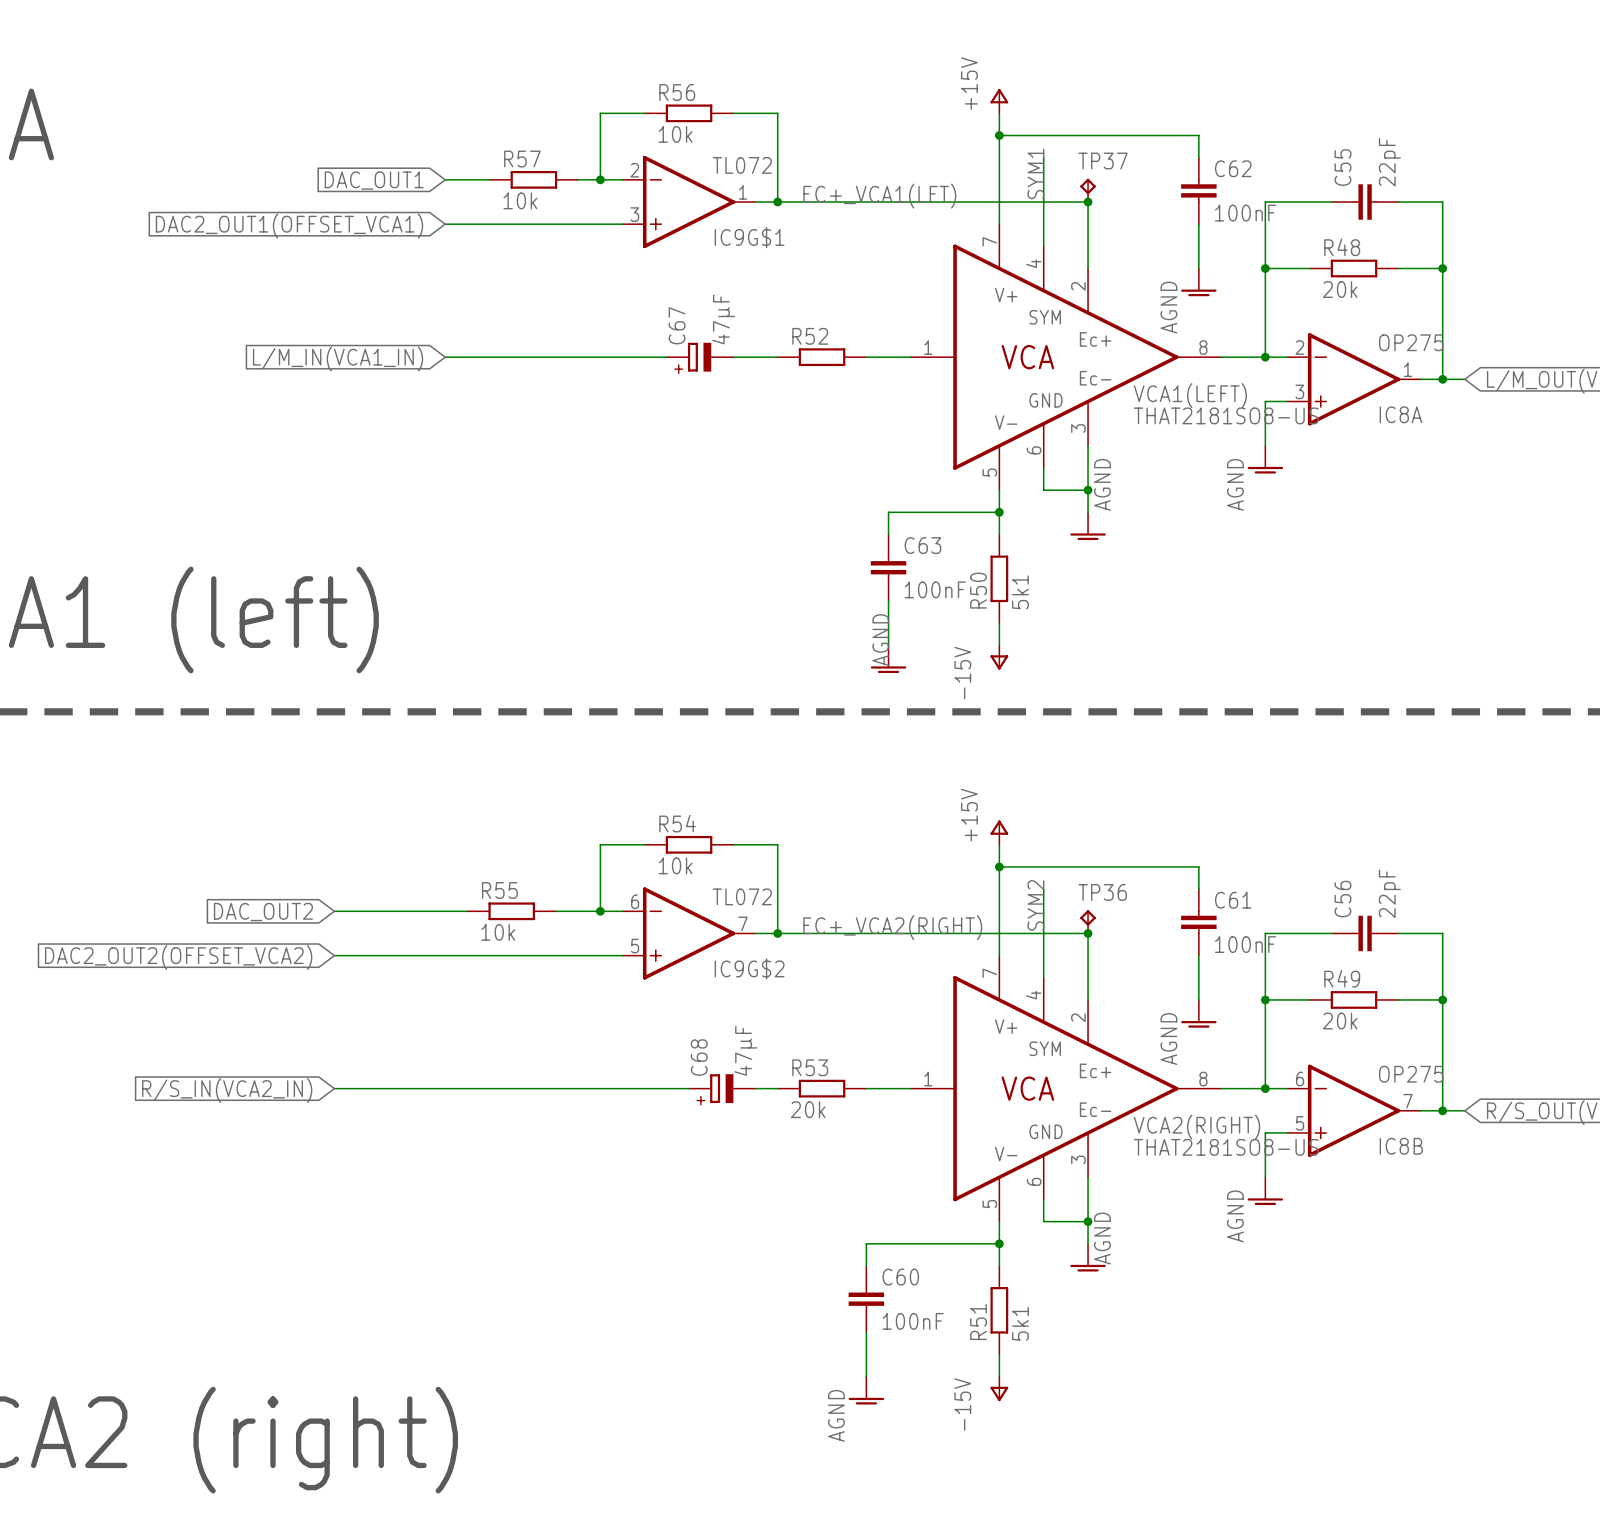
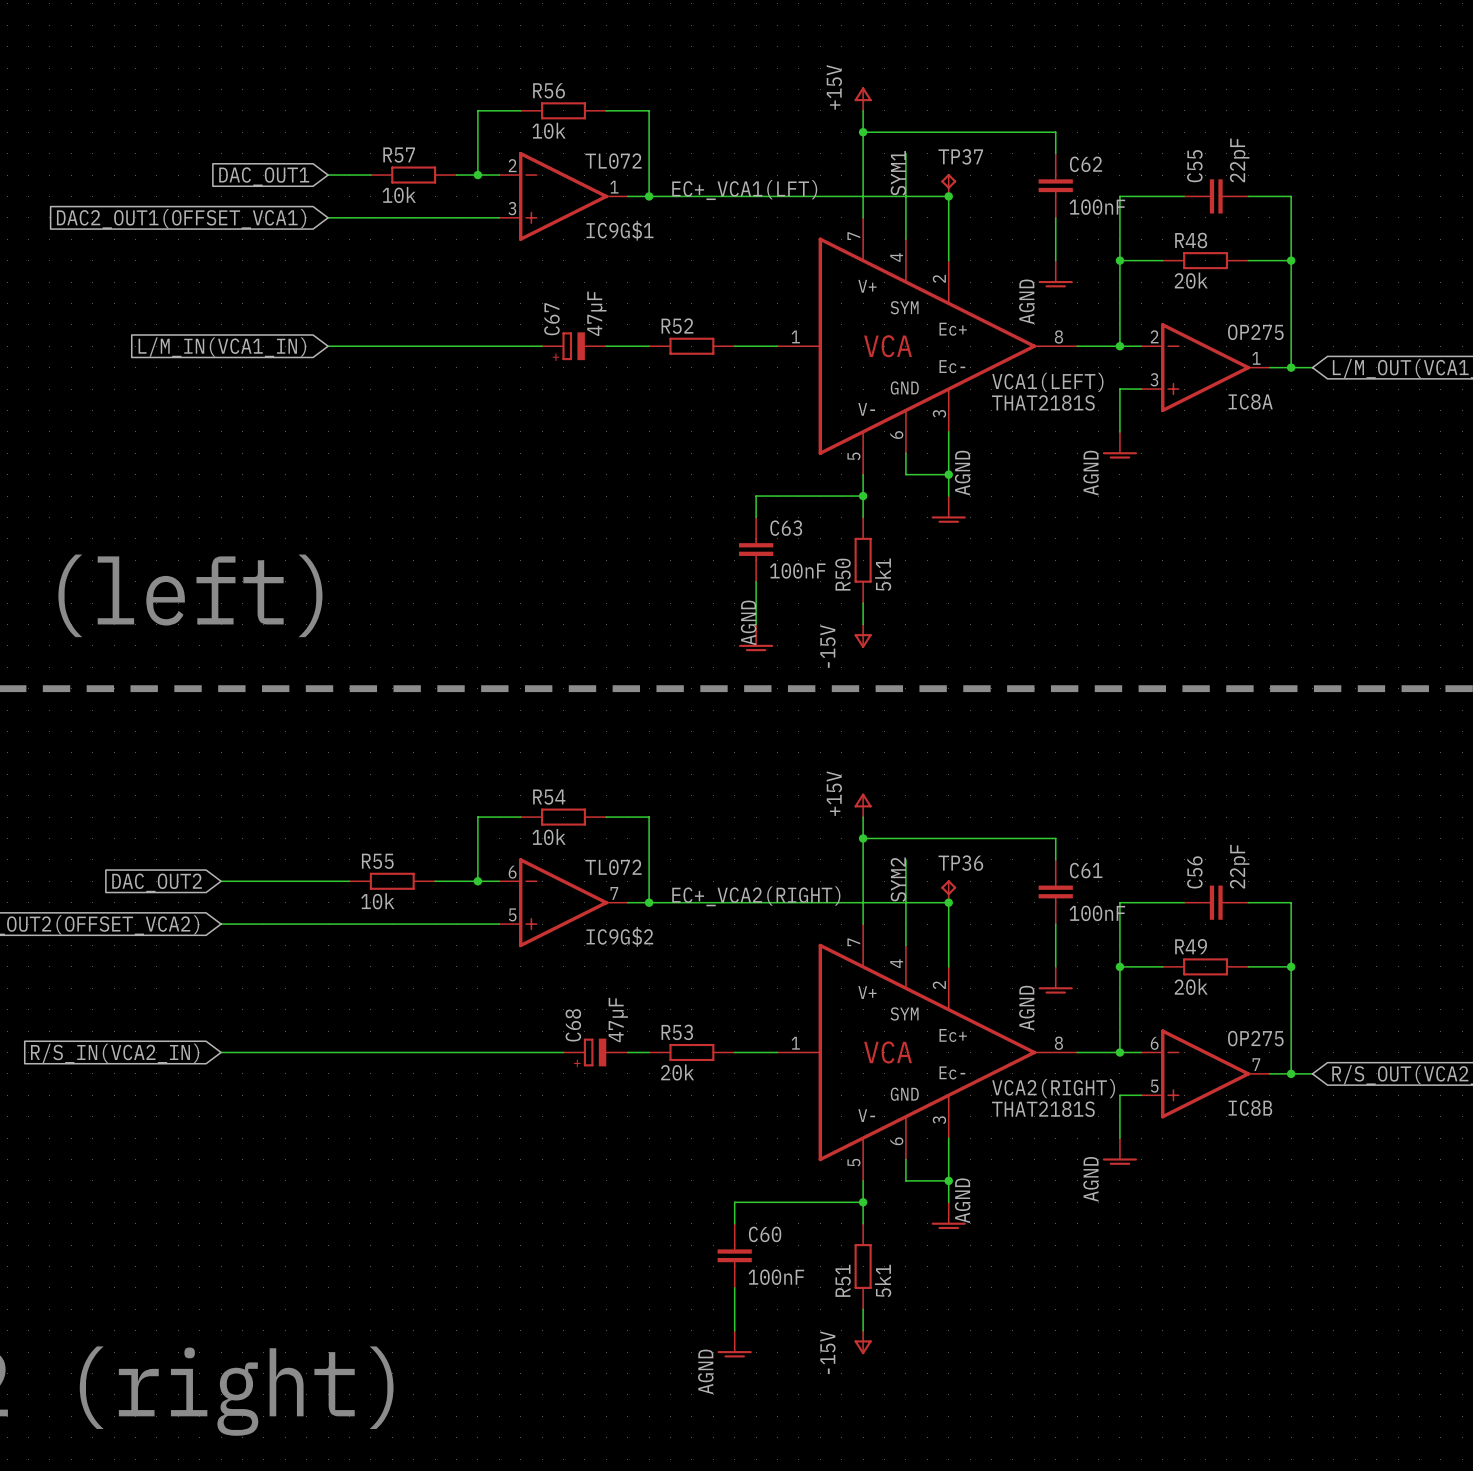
VCA1(LEFT) value: THAT2181SO8-US (1226, 415) -> THAT2181S (1043, 402)
VCA2(RIGHT) value: THAT2181SO8-US (1226, 1147) -> THAT2181S (1043, 1109)

